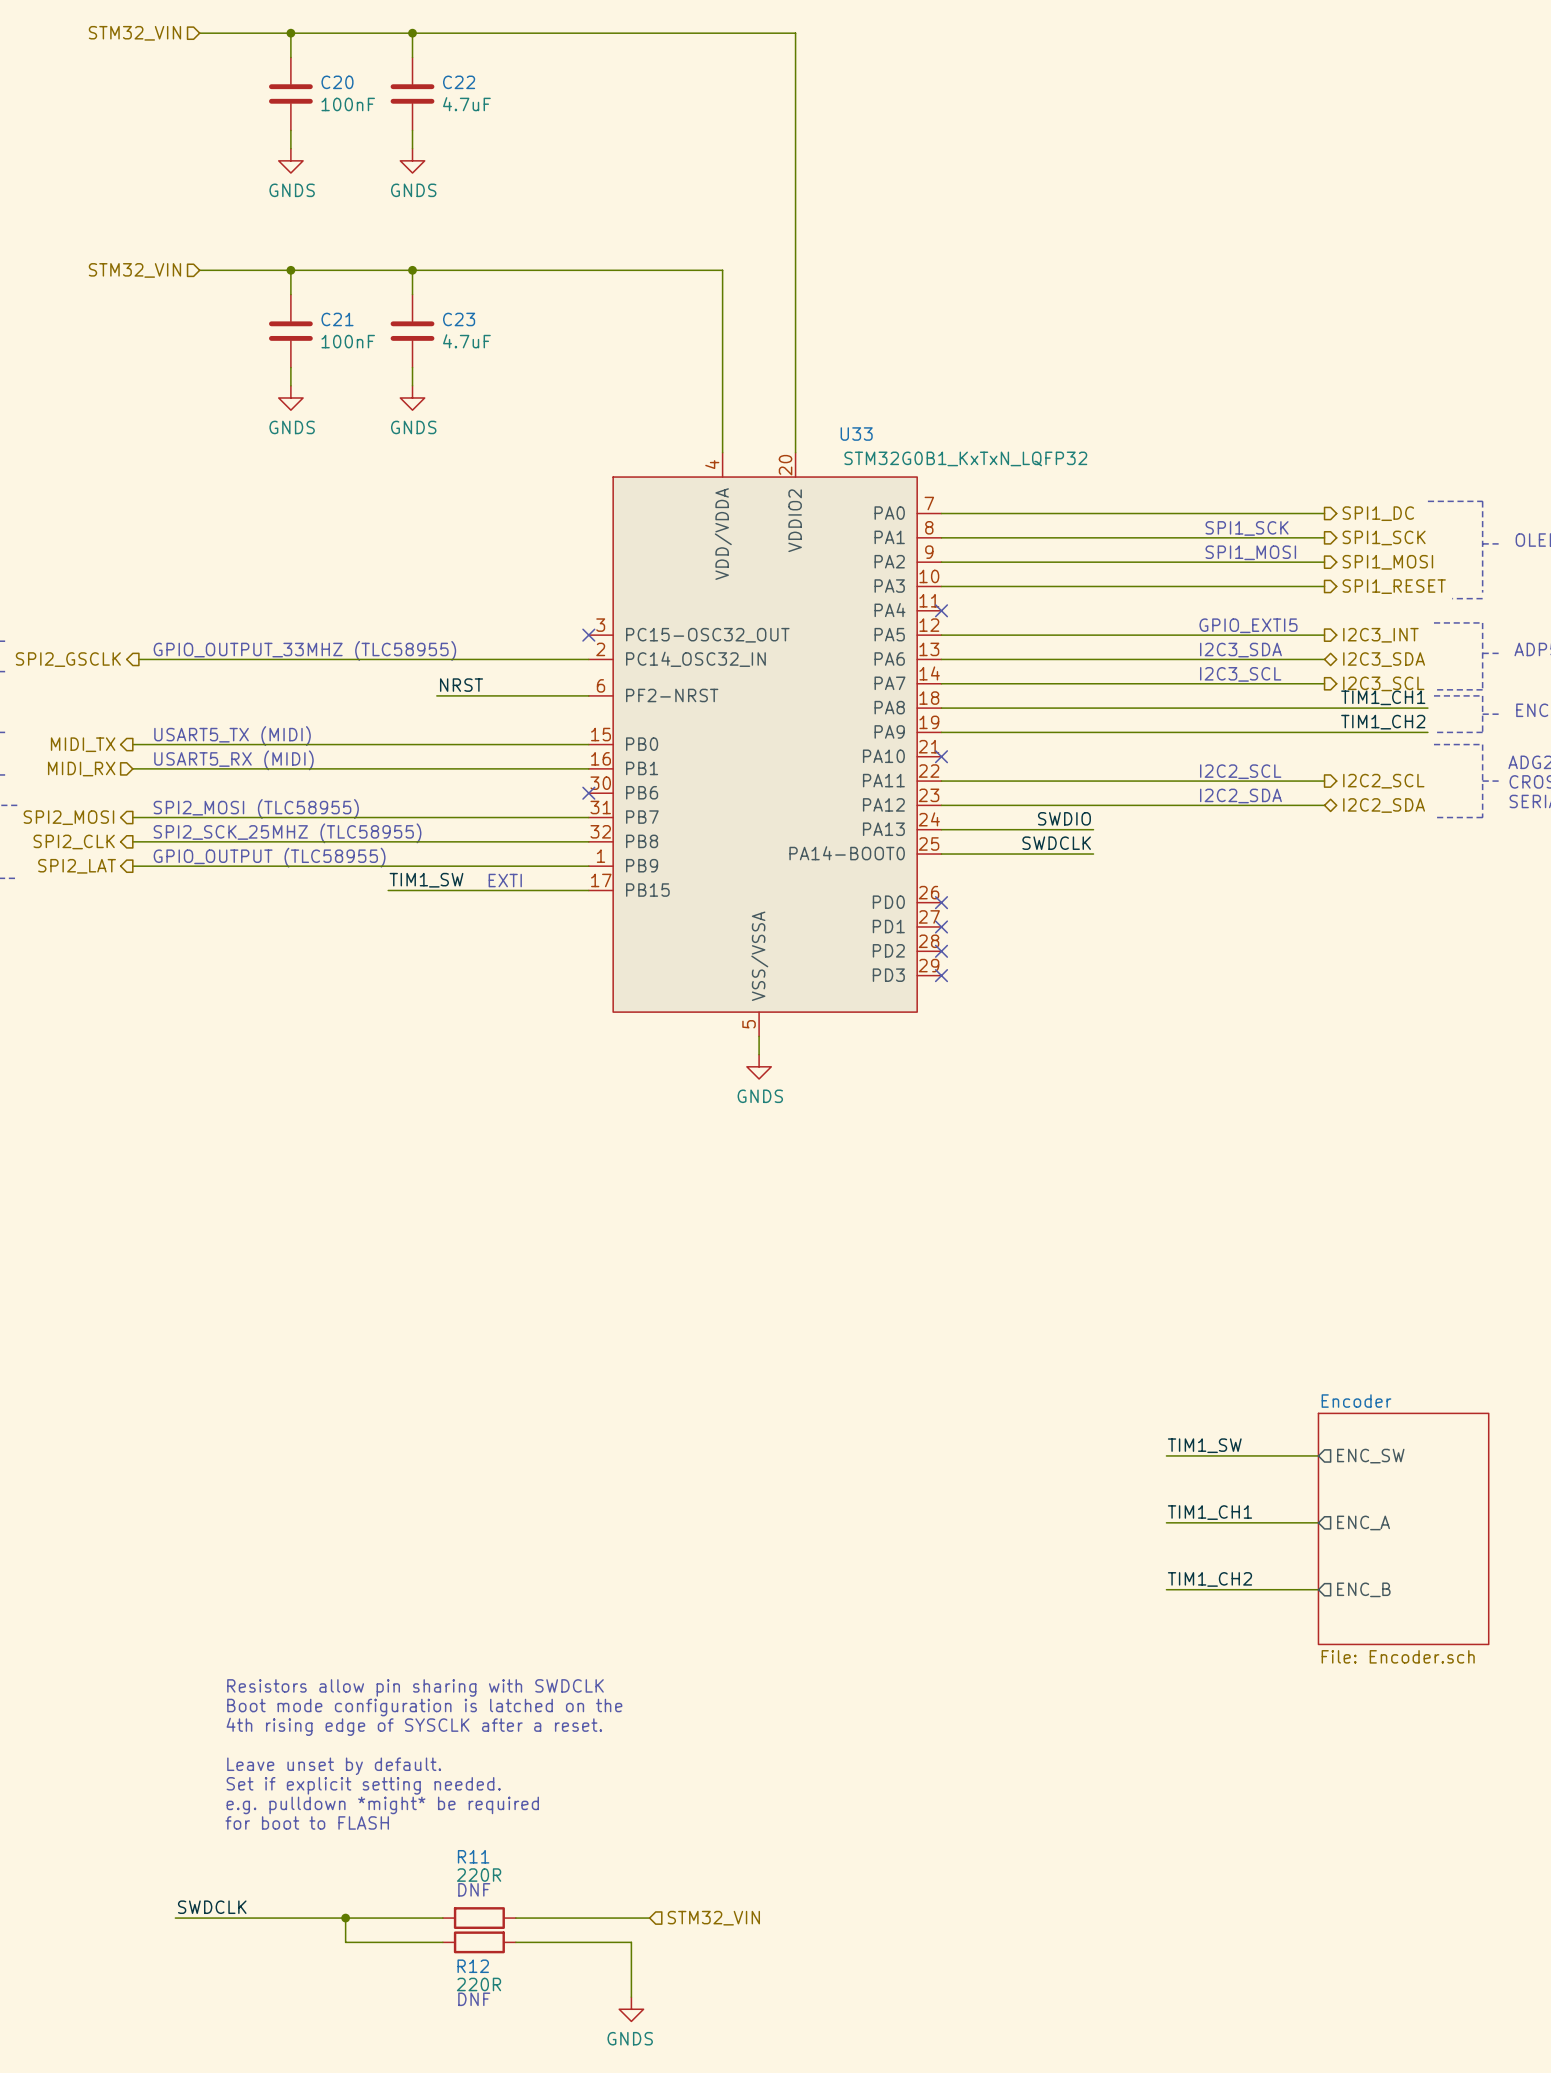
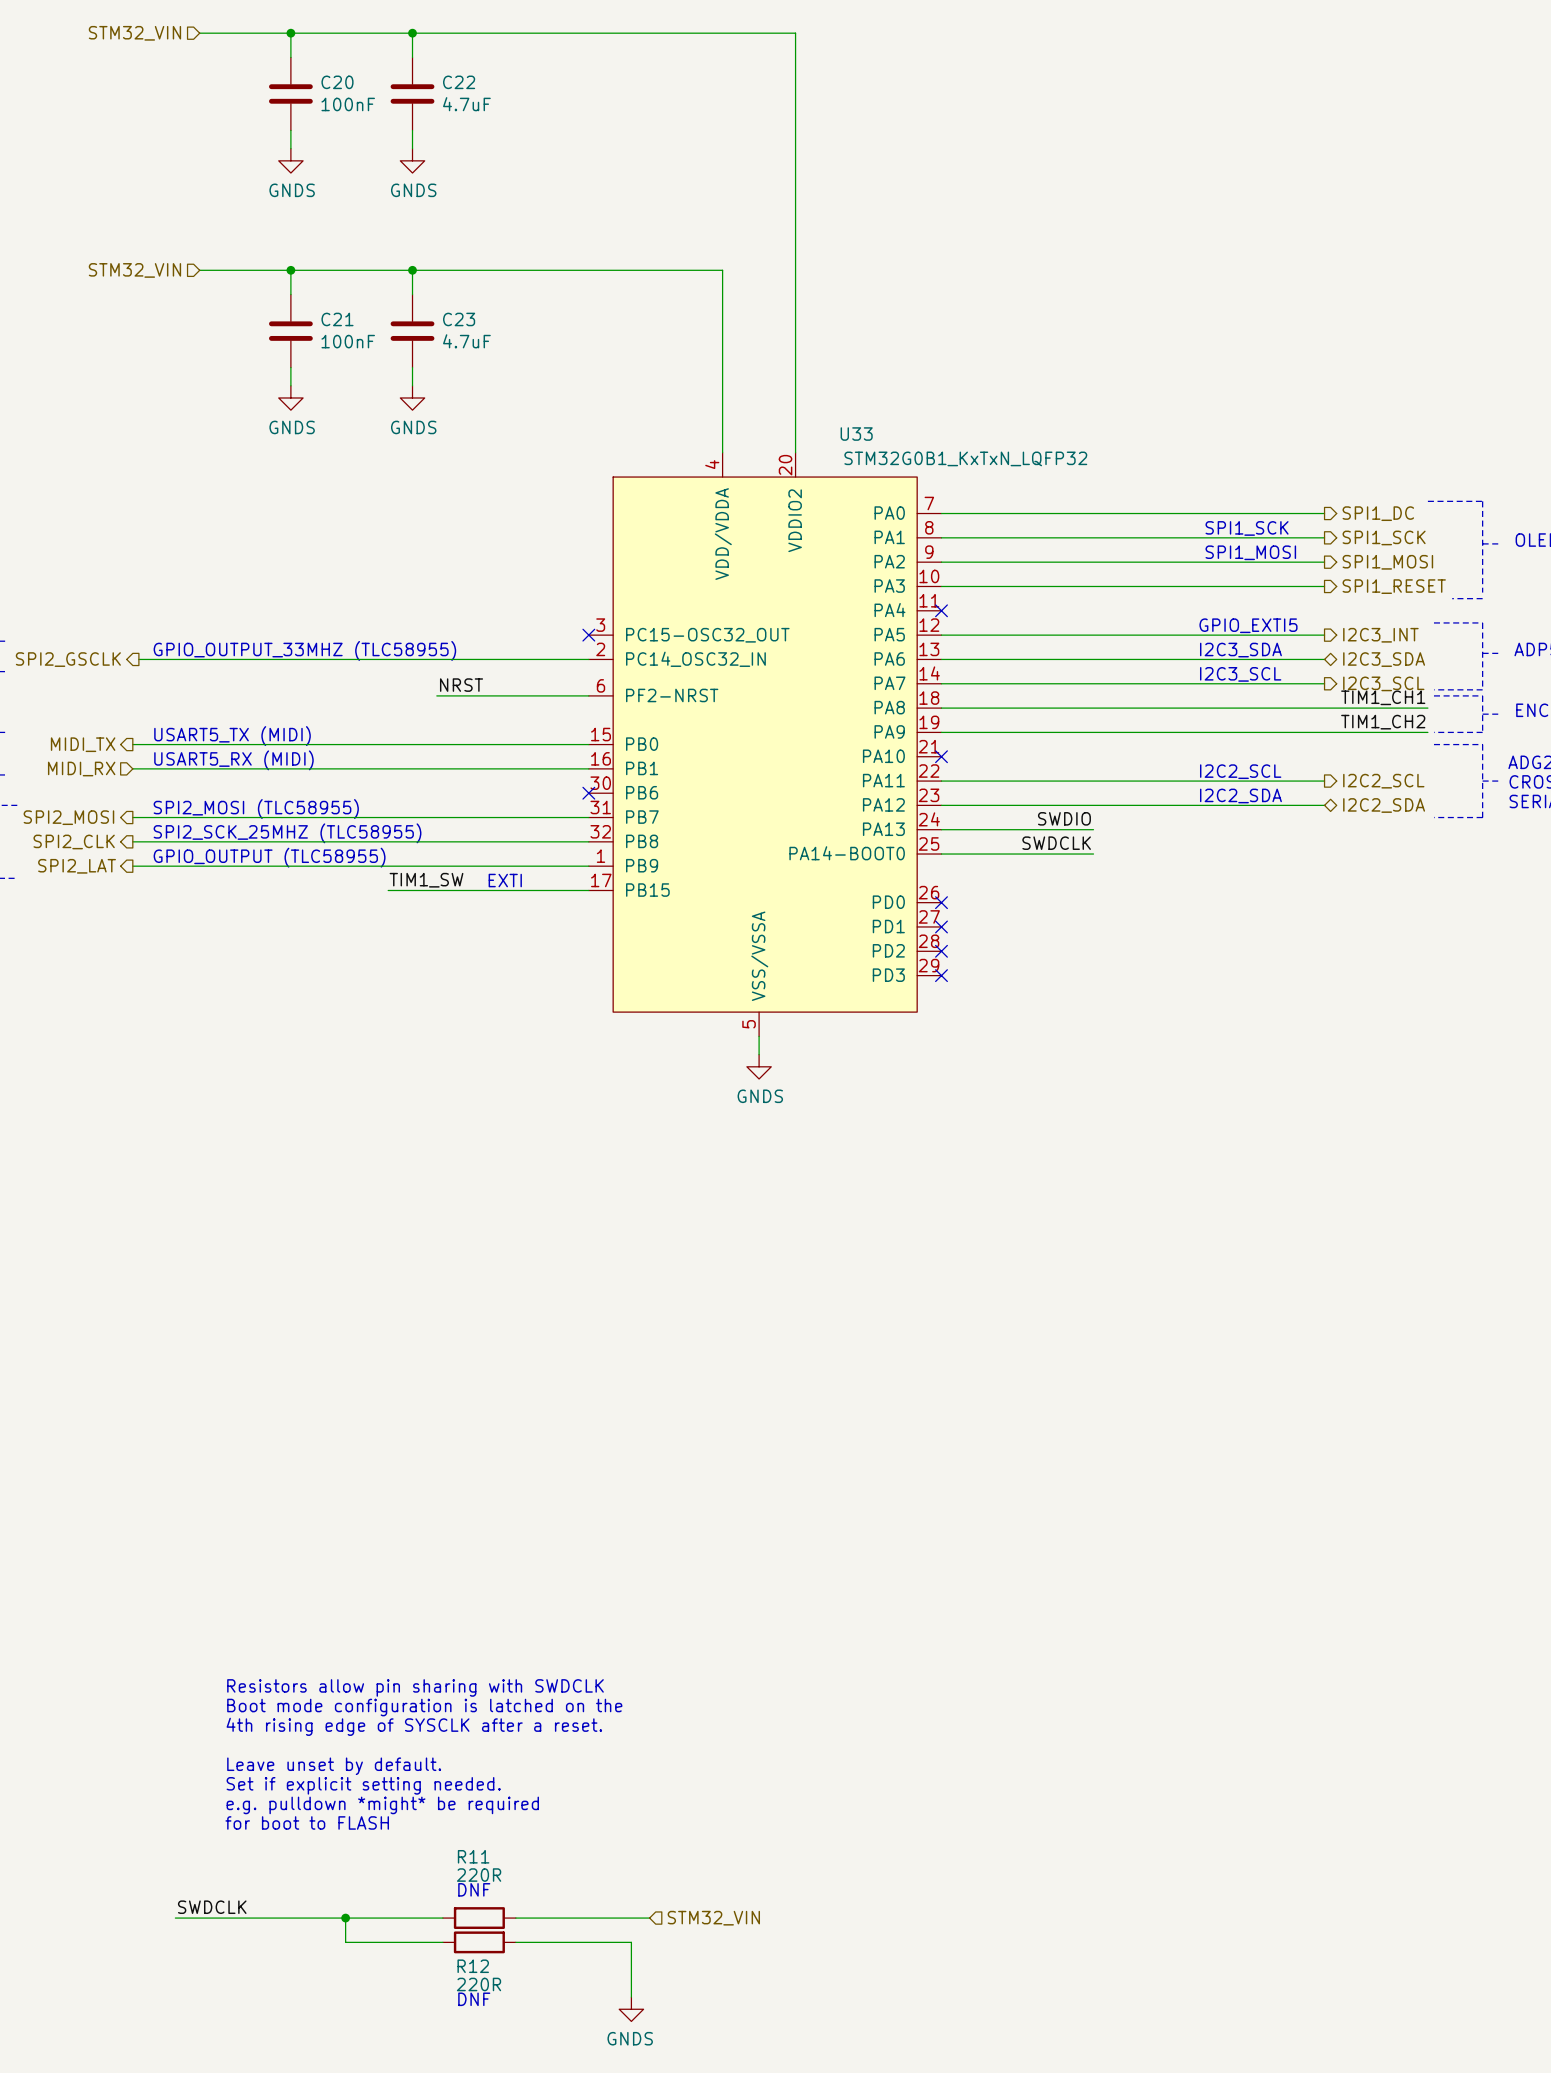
label: TIM1_SW (1204, 1445) -> none
wire: (1166, 1455) (1318, 1455) -> none
sheet pin: ENC_SW (1370, 1456) -> none
label: TIM1_CH1 (1209, 1512) -> none
wire: (1166, 1522) (1318, 1522) -> none
sheet pin: ENC_A (1363, 1522) -> none
sheet Encoder: File: Encoder.sch (1403, 1528) -> none
label: TIM1_CH2 (1209, 1579) -> none
wire: (1166, 1589) (1318, 1589) -> none
sheet pin: ENC_B (1363, 1589) -> none

